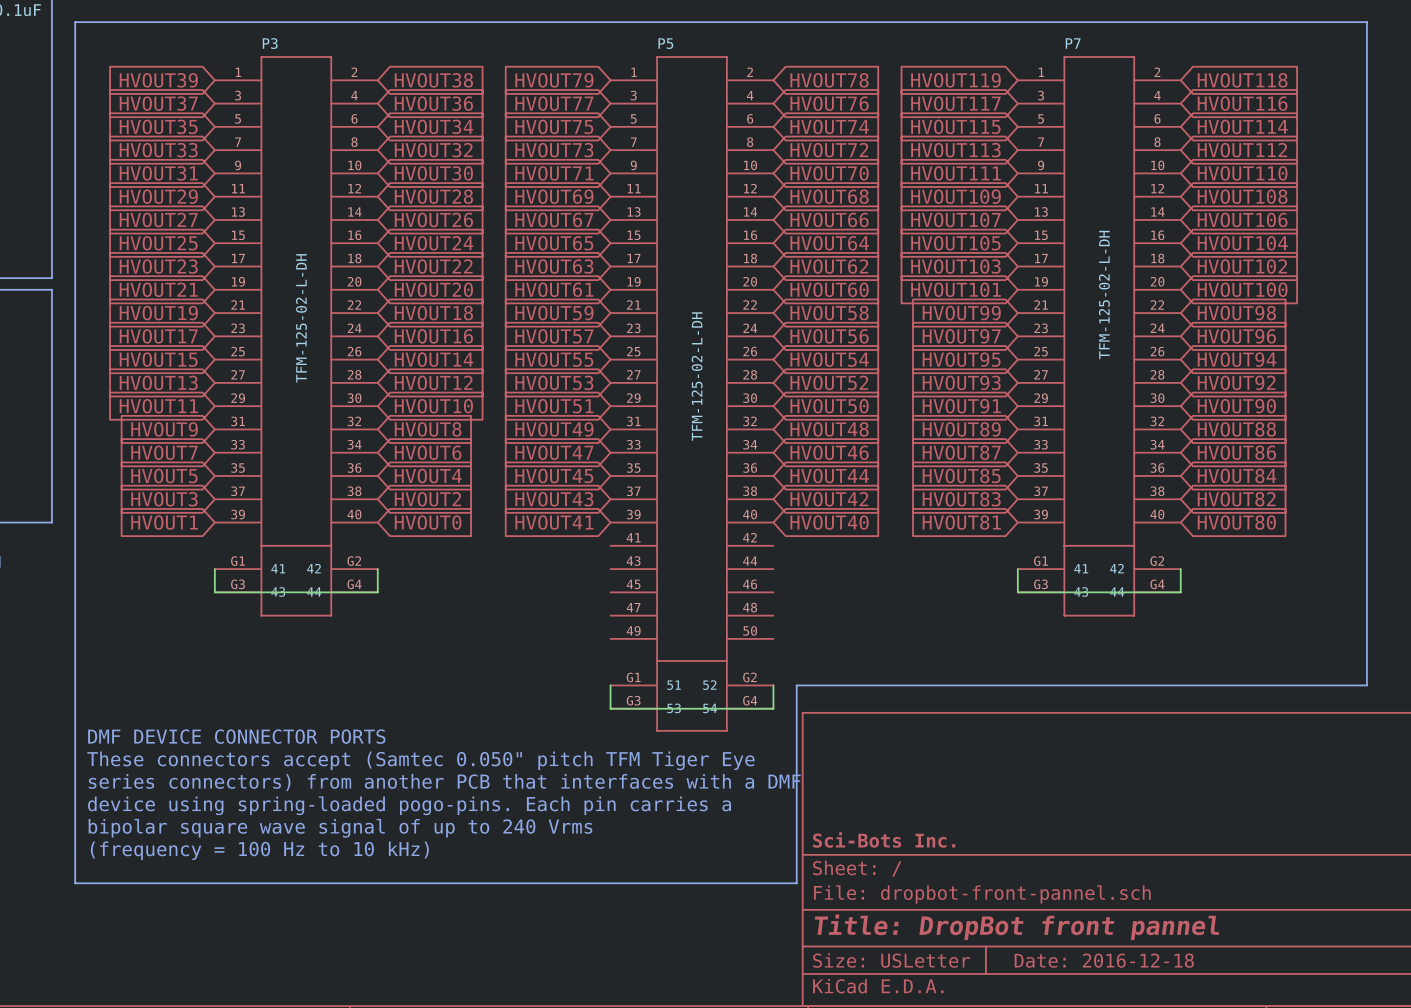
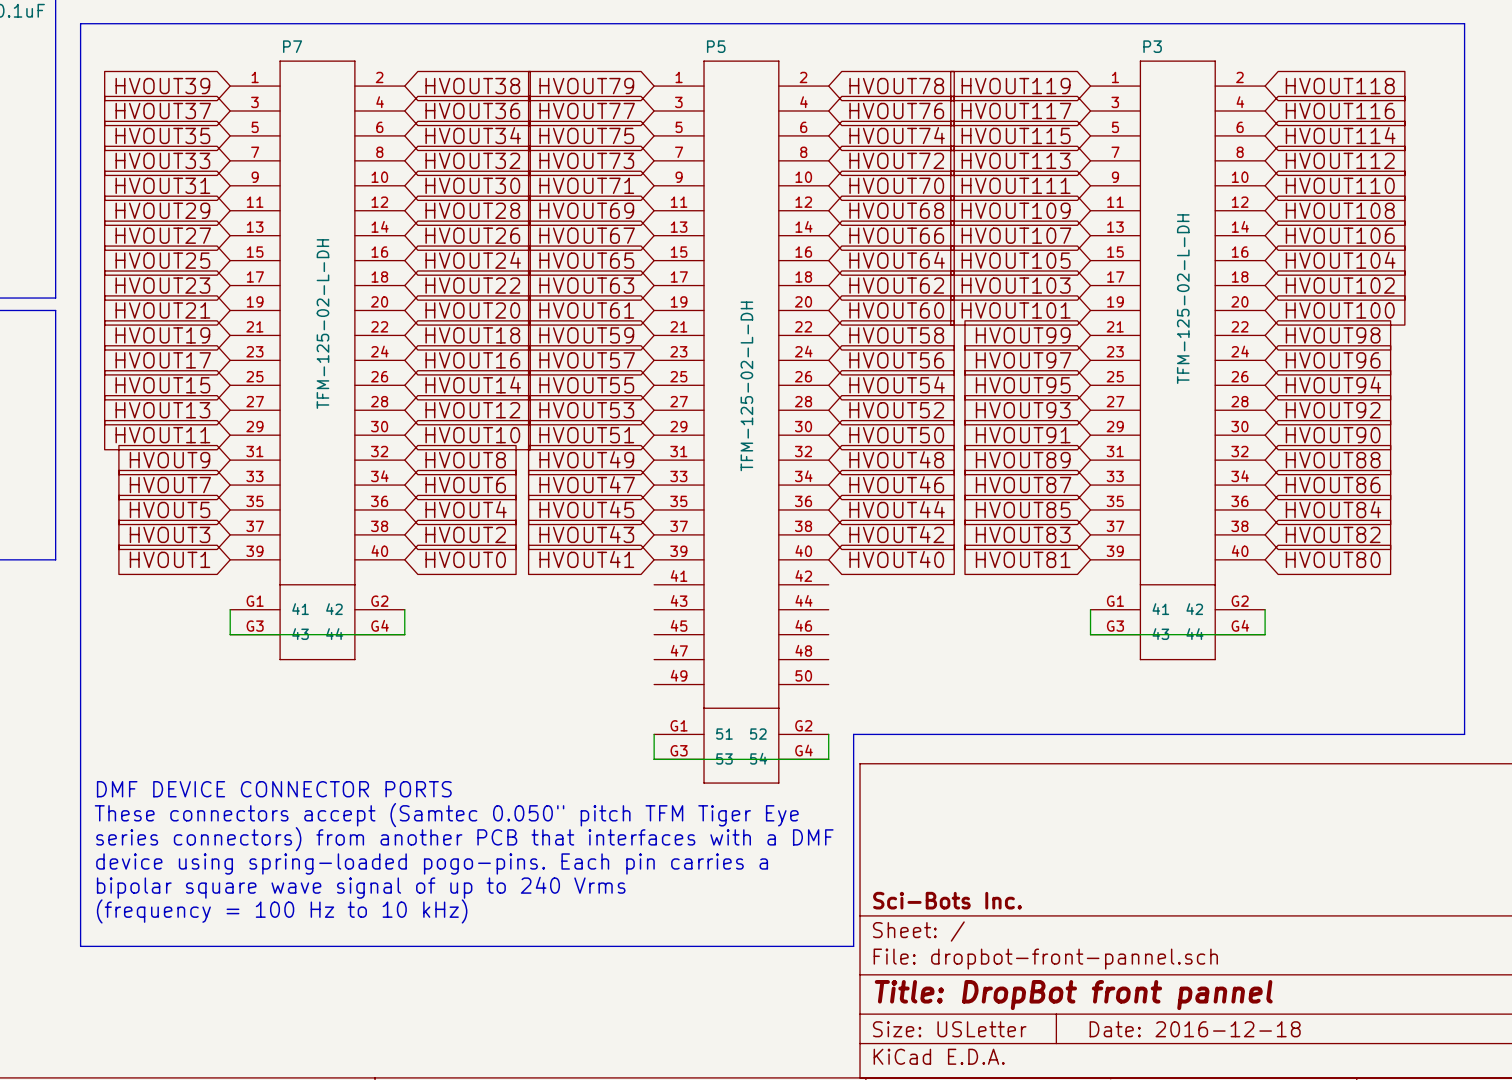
P3 name: P3 (270, 43) -> P7 (292, 46)
P7 name: P7 (1073, 43) -> P3 (1152, 46)

